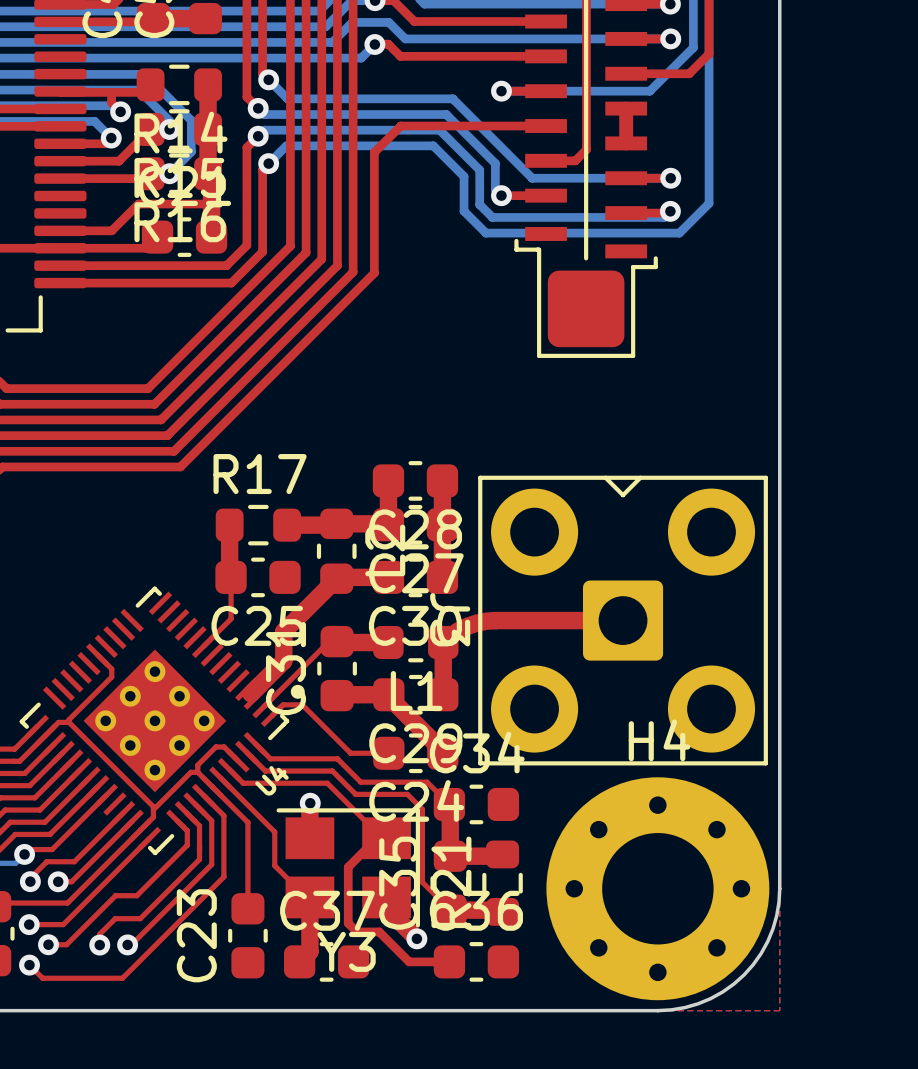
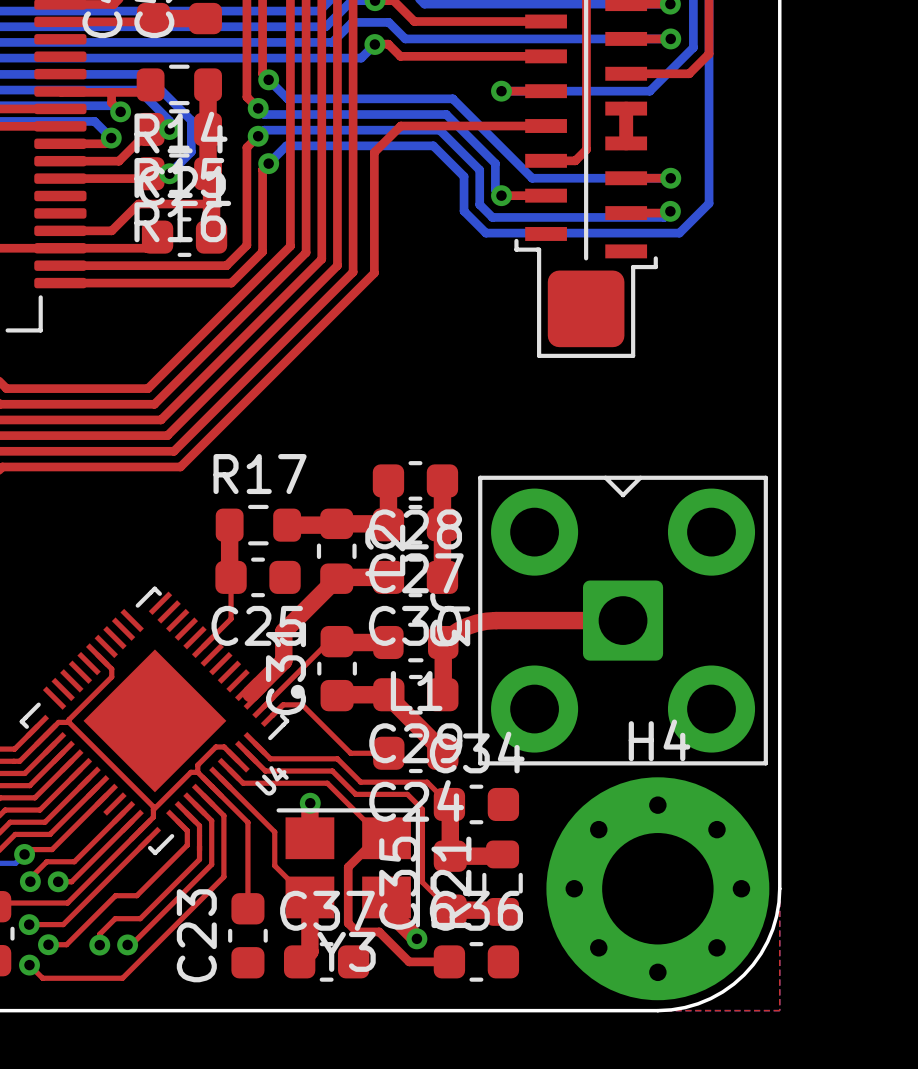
U4 footprint: [19, 586, 305, 856] -> [19, 586, 305, 856]

